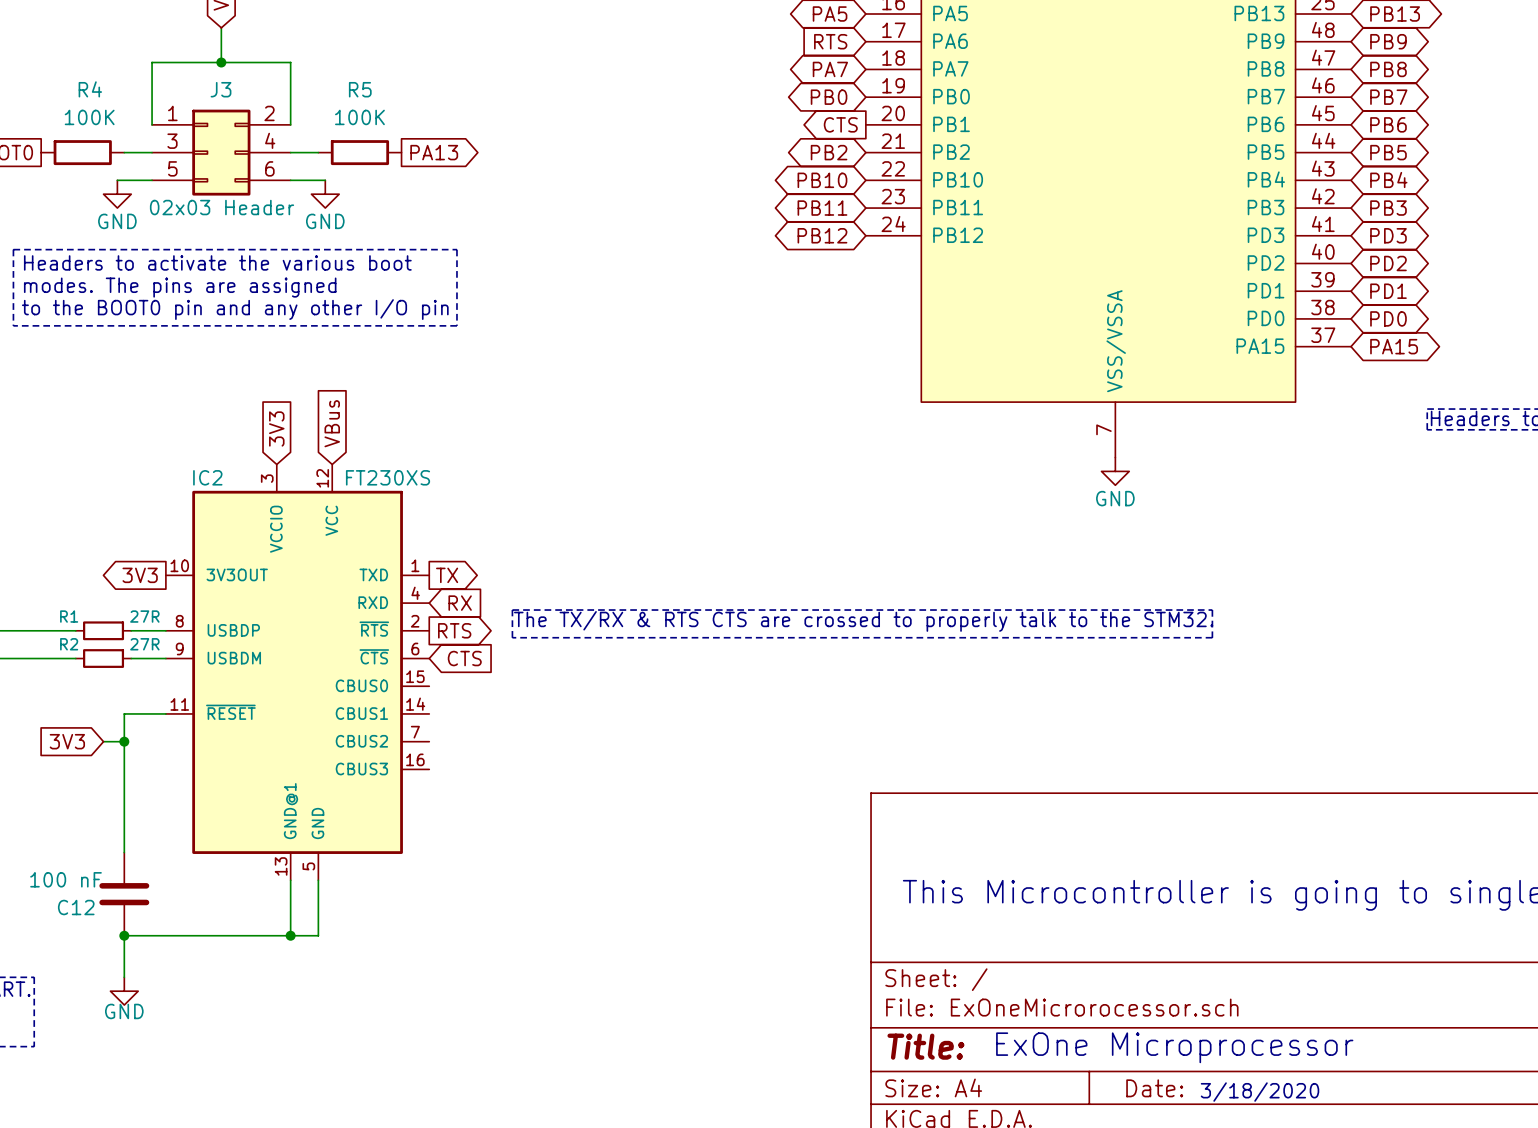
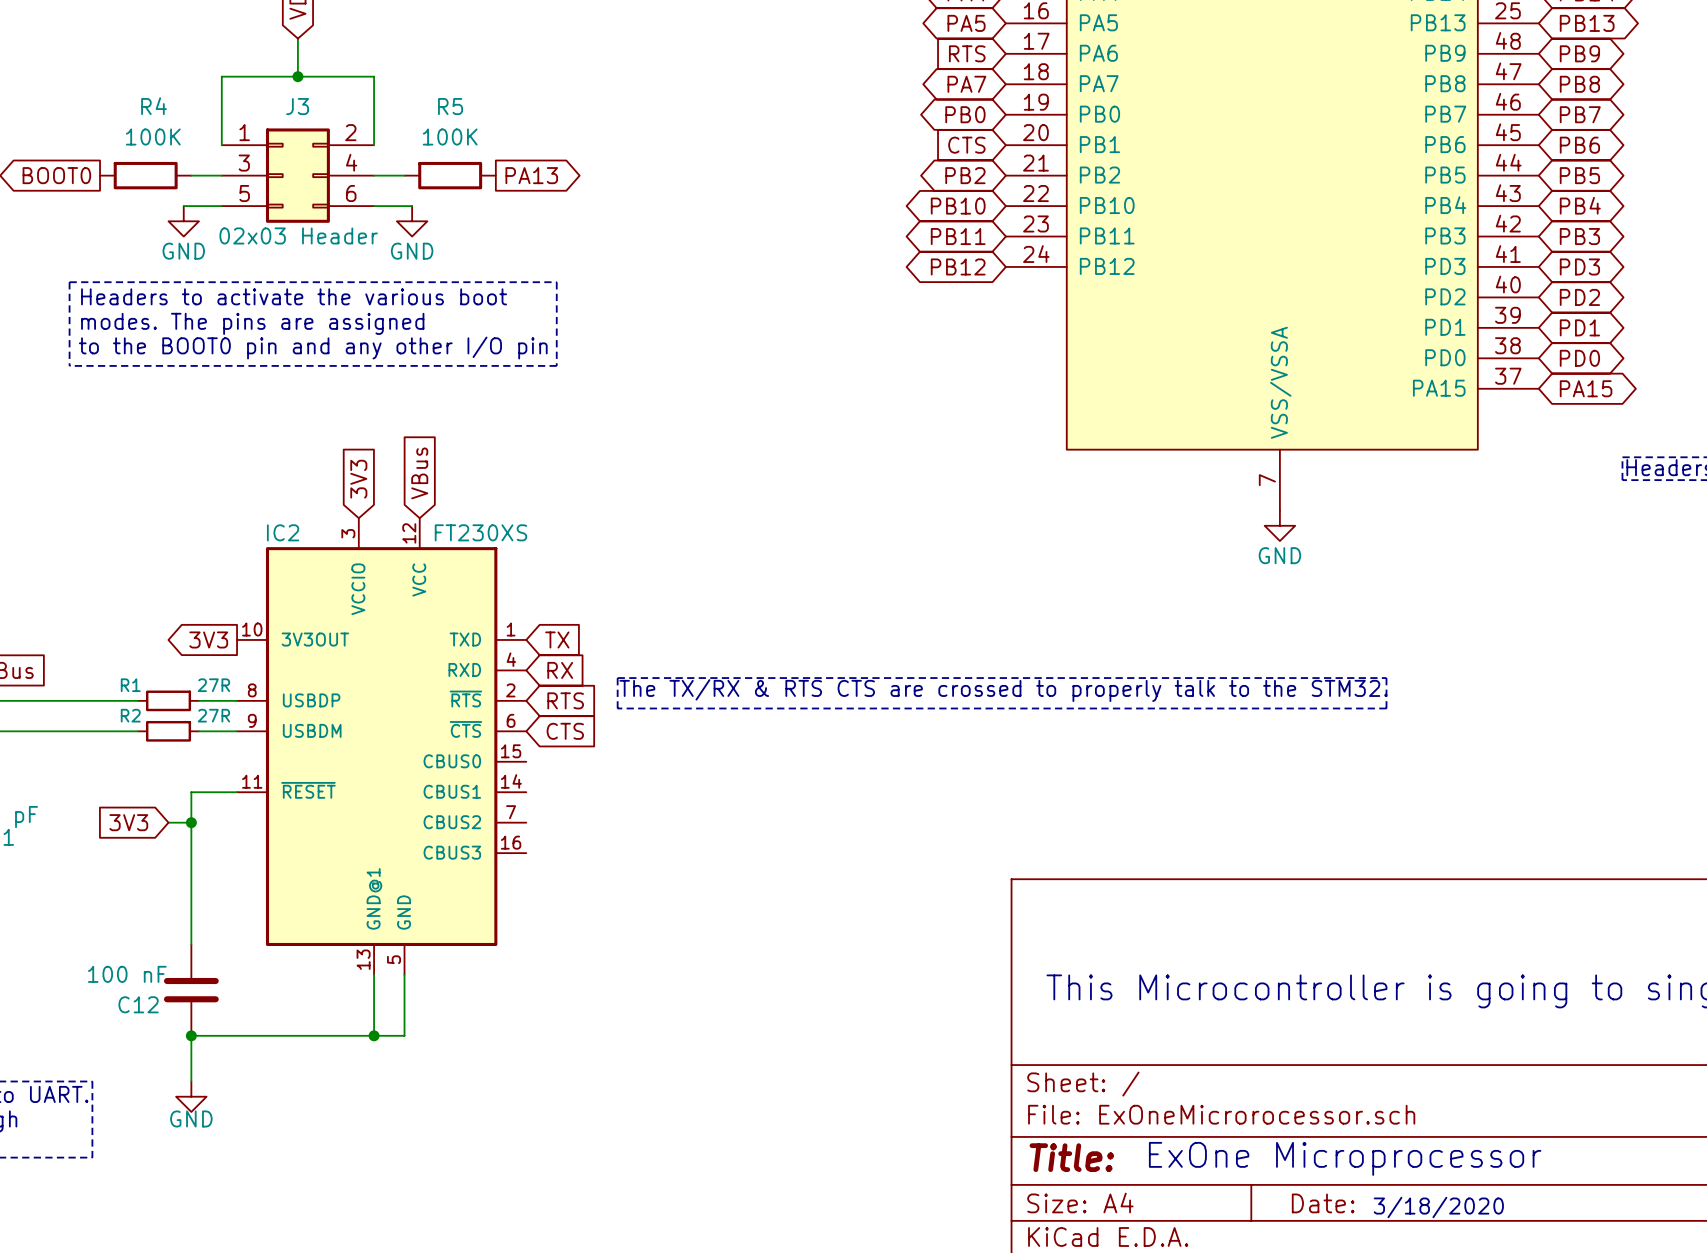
global label shape: output (840, 124) -> input (966, 145)
global label shape: output (447, 575) -> input (557, 639)
global label shape: output (454, 630) -> input (565, 700)

